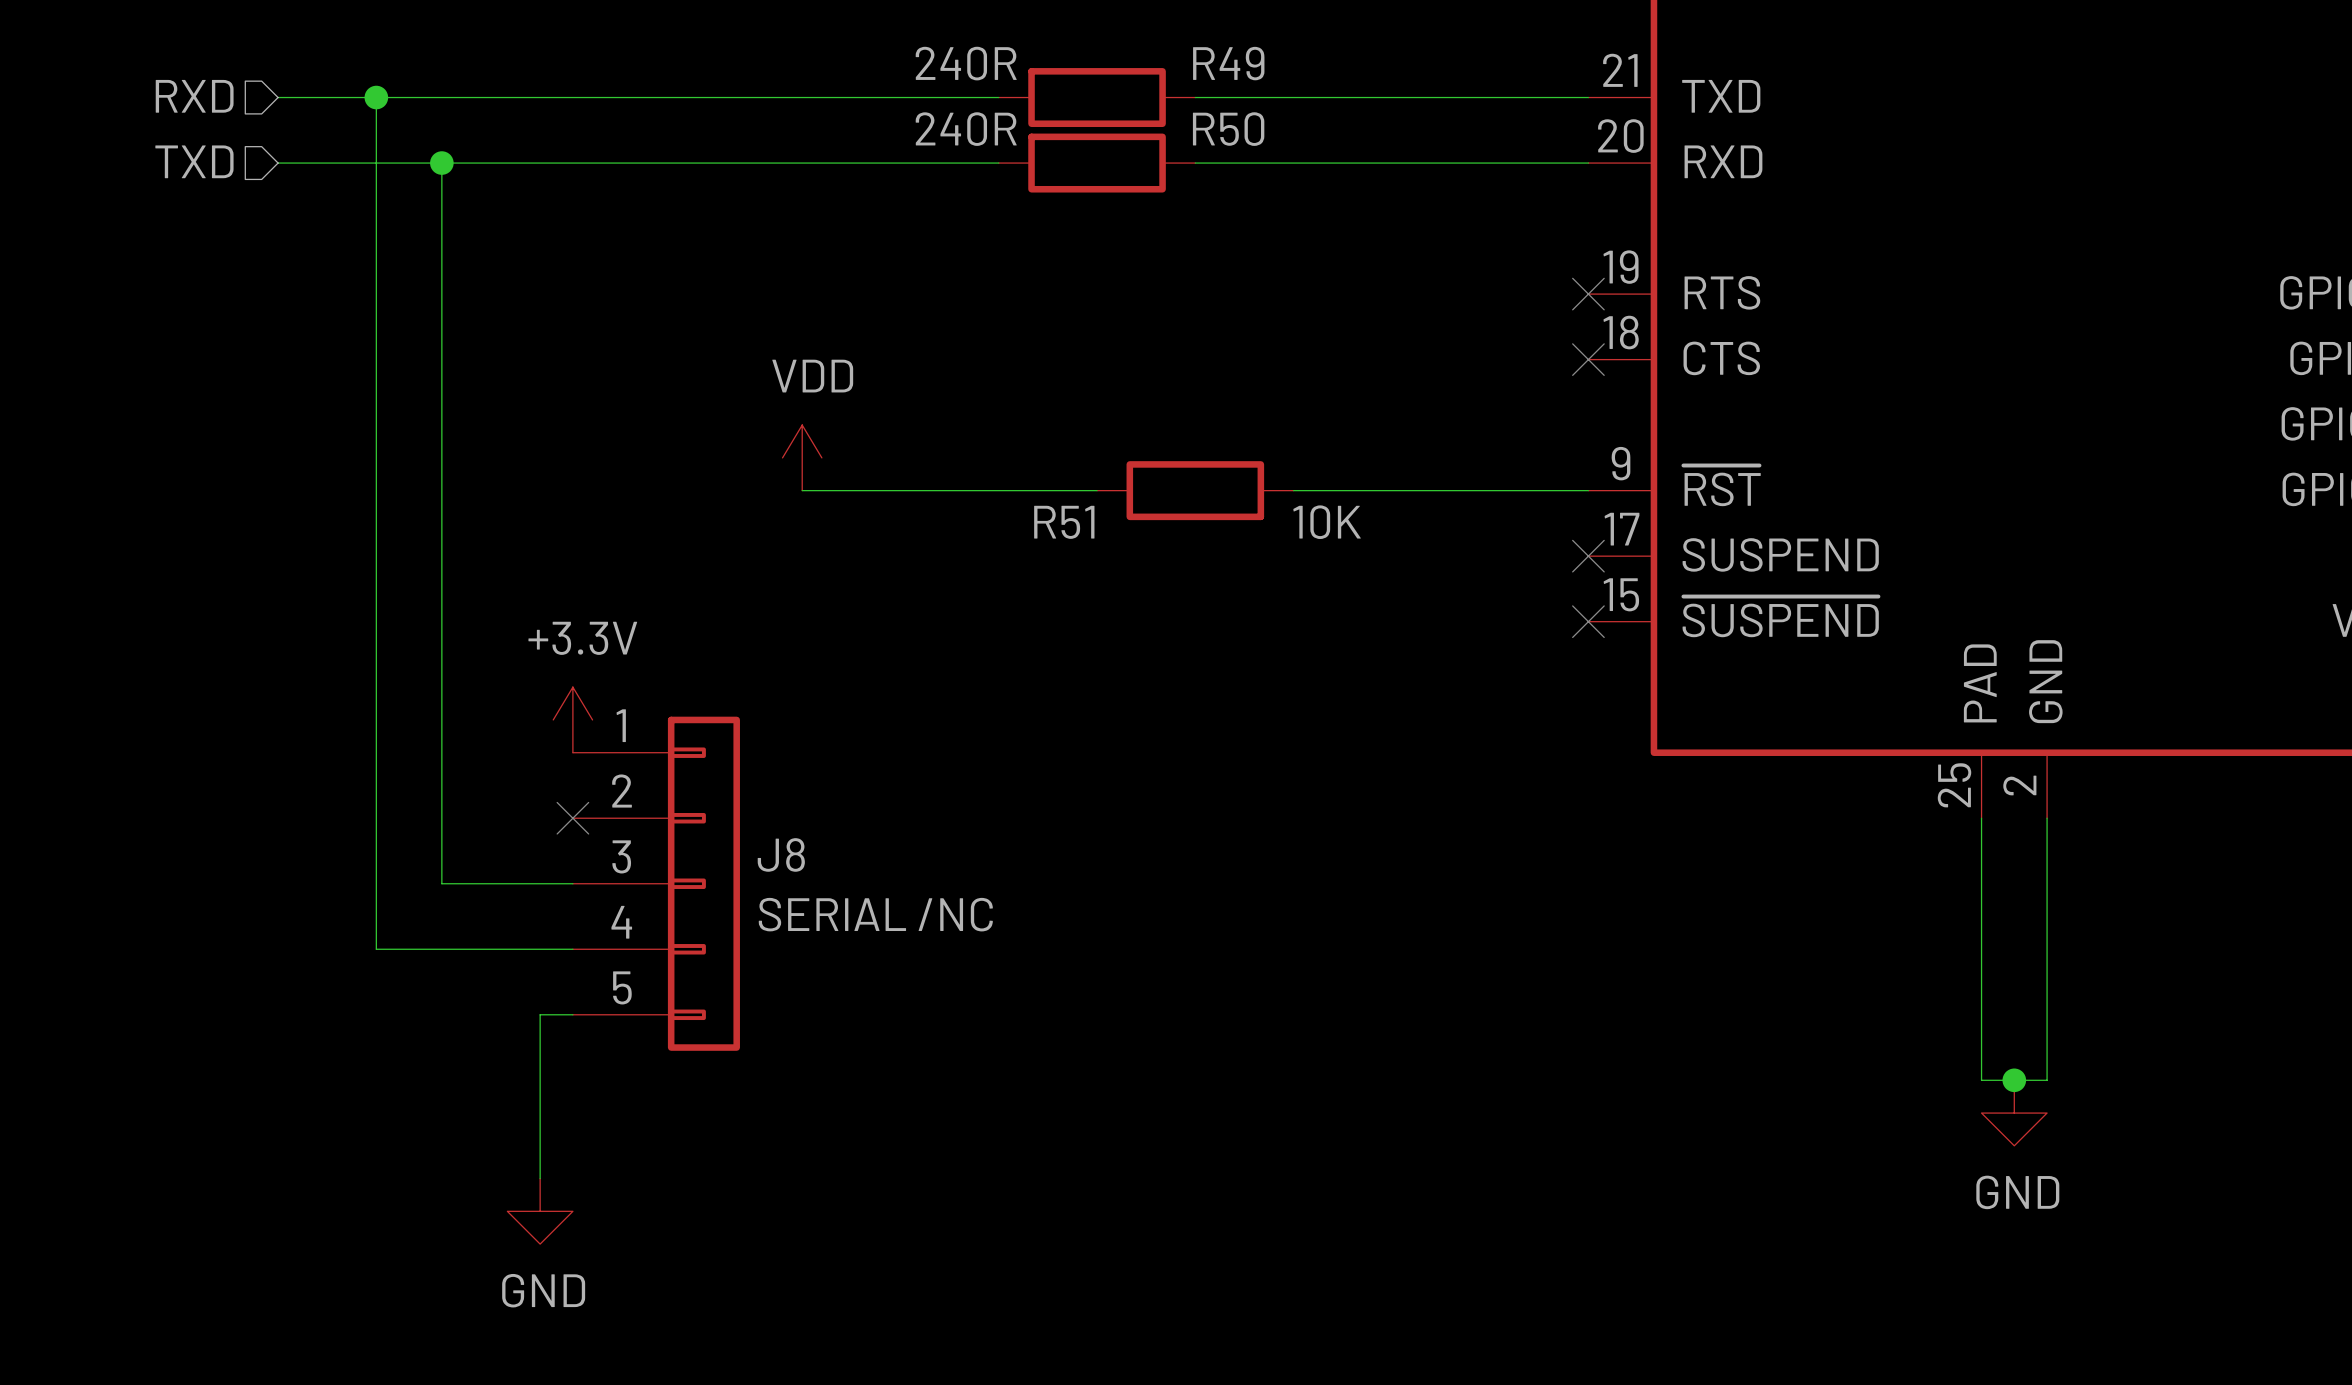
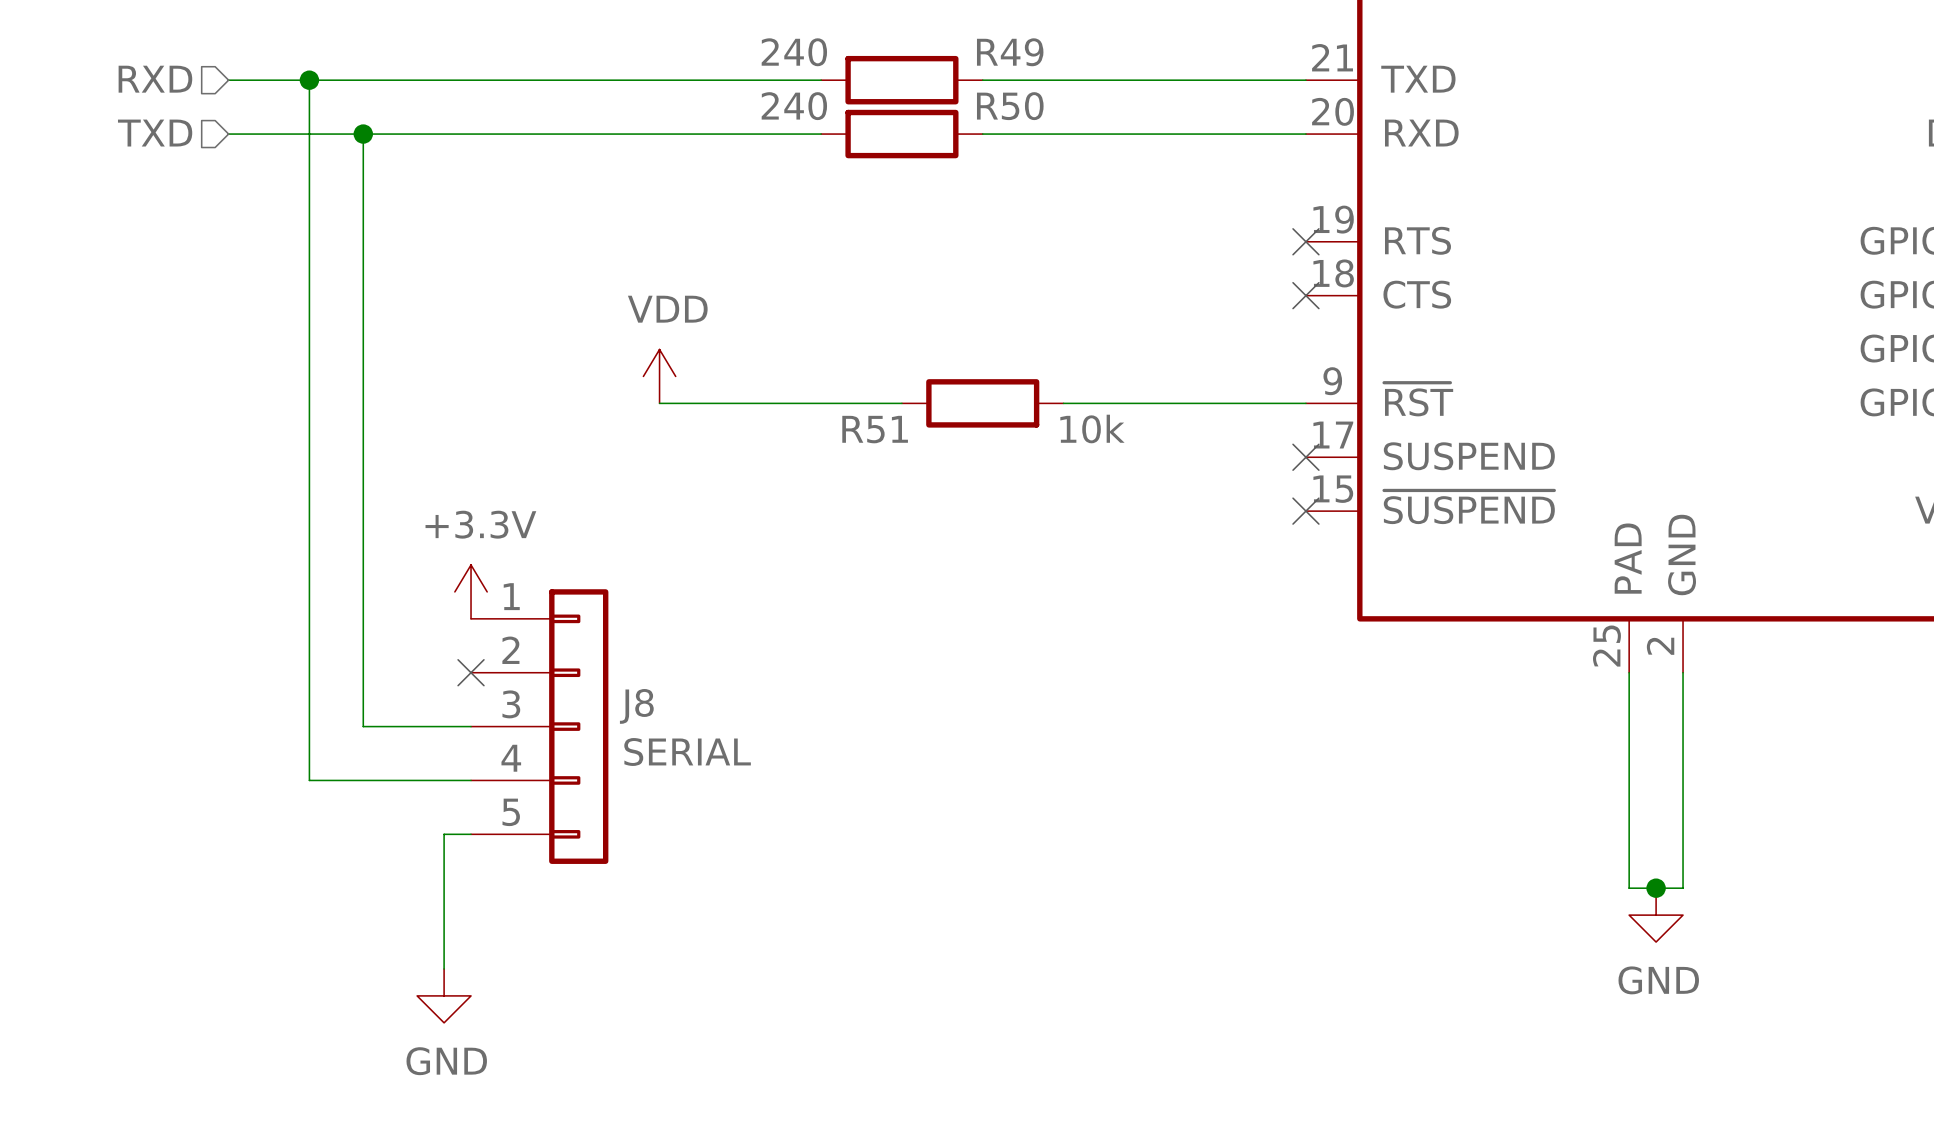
R49 value: 240R (966, 63) -> 240 (794, 52)
R50 value: 240R (966, 129) -> 240 (794, 106)
R51 value: 10K (1327, 522) -> 10k (1092, 429)
J8 value: SERIAL /NC (875, 914) -> SERIAL (687, 751)

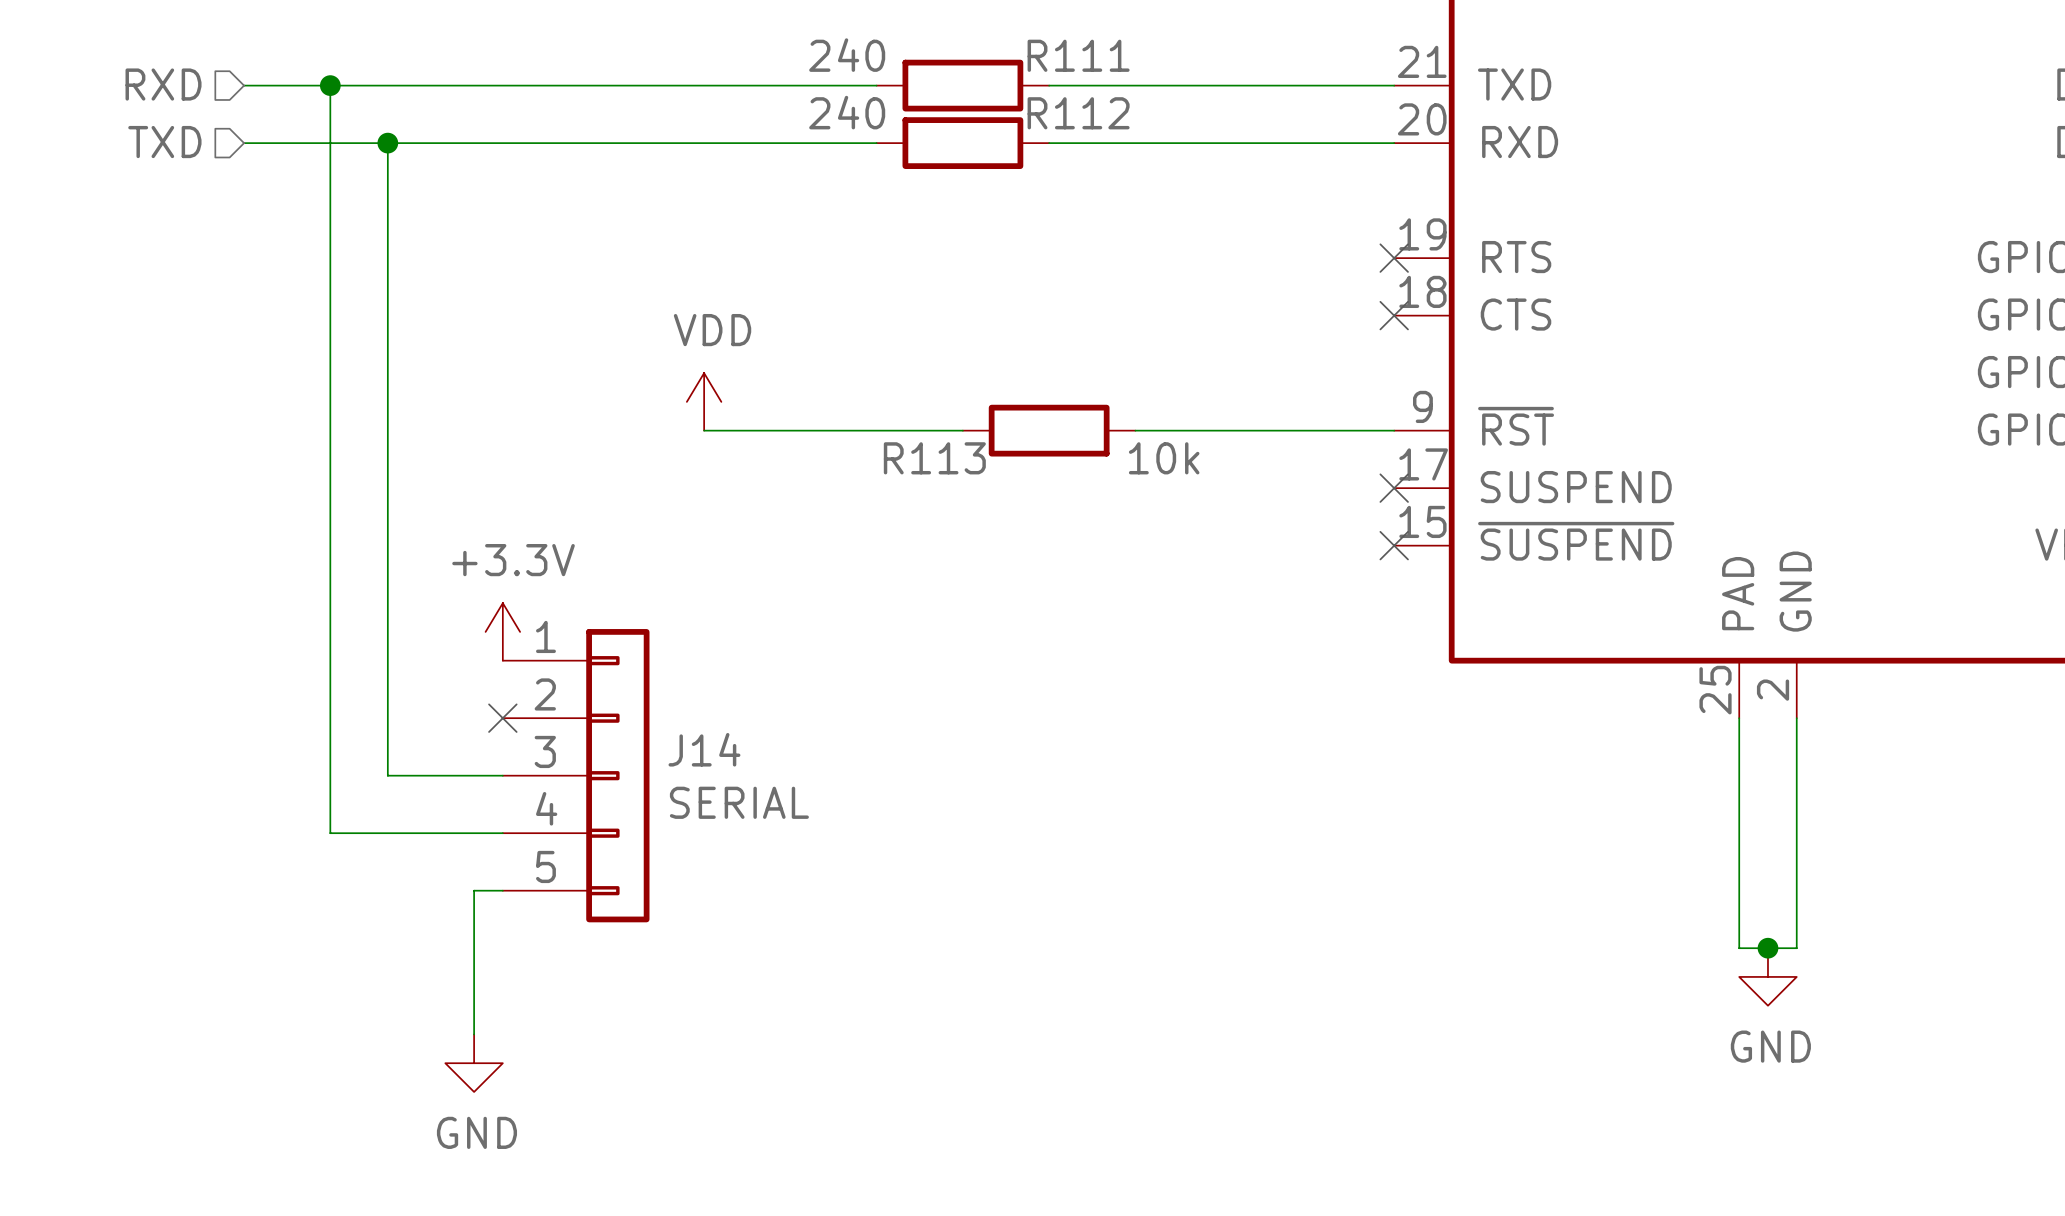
R49 name: R49 (1010, 52) -> R111 (1078, 55)
R50 name: R50 (1010, 106) -> R112 (1078, 113)
R51 name: R51 (875, 429) -> R113 (934, 458)
J8 name: J8 (636, 706) -> J14 (704, 749)

